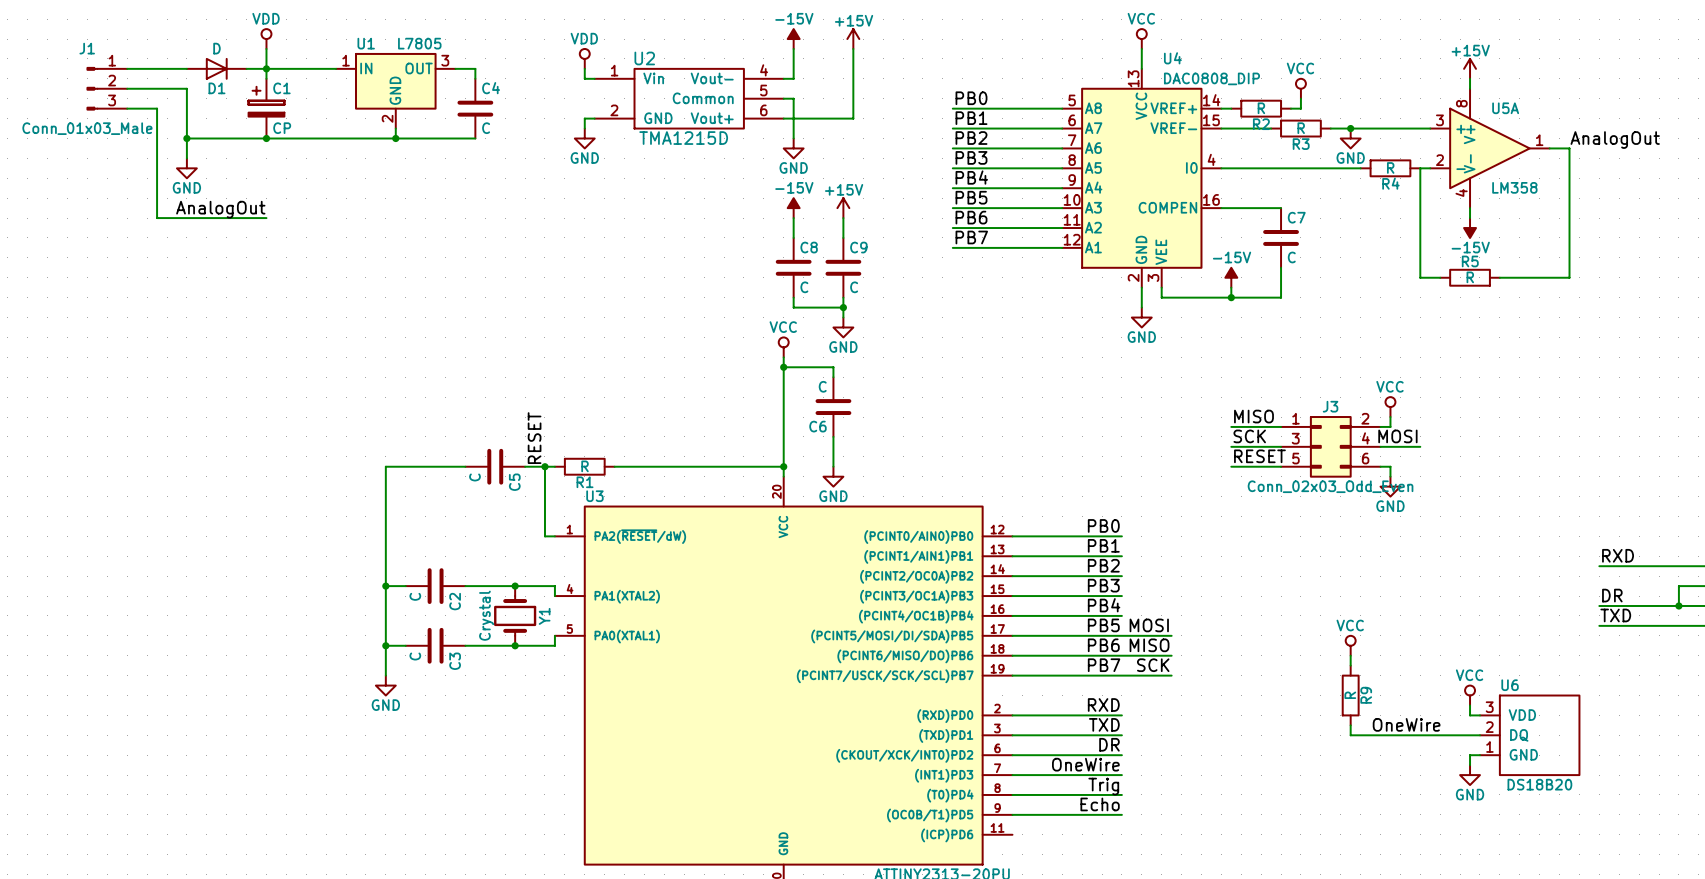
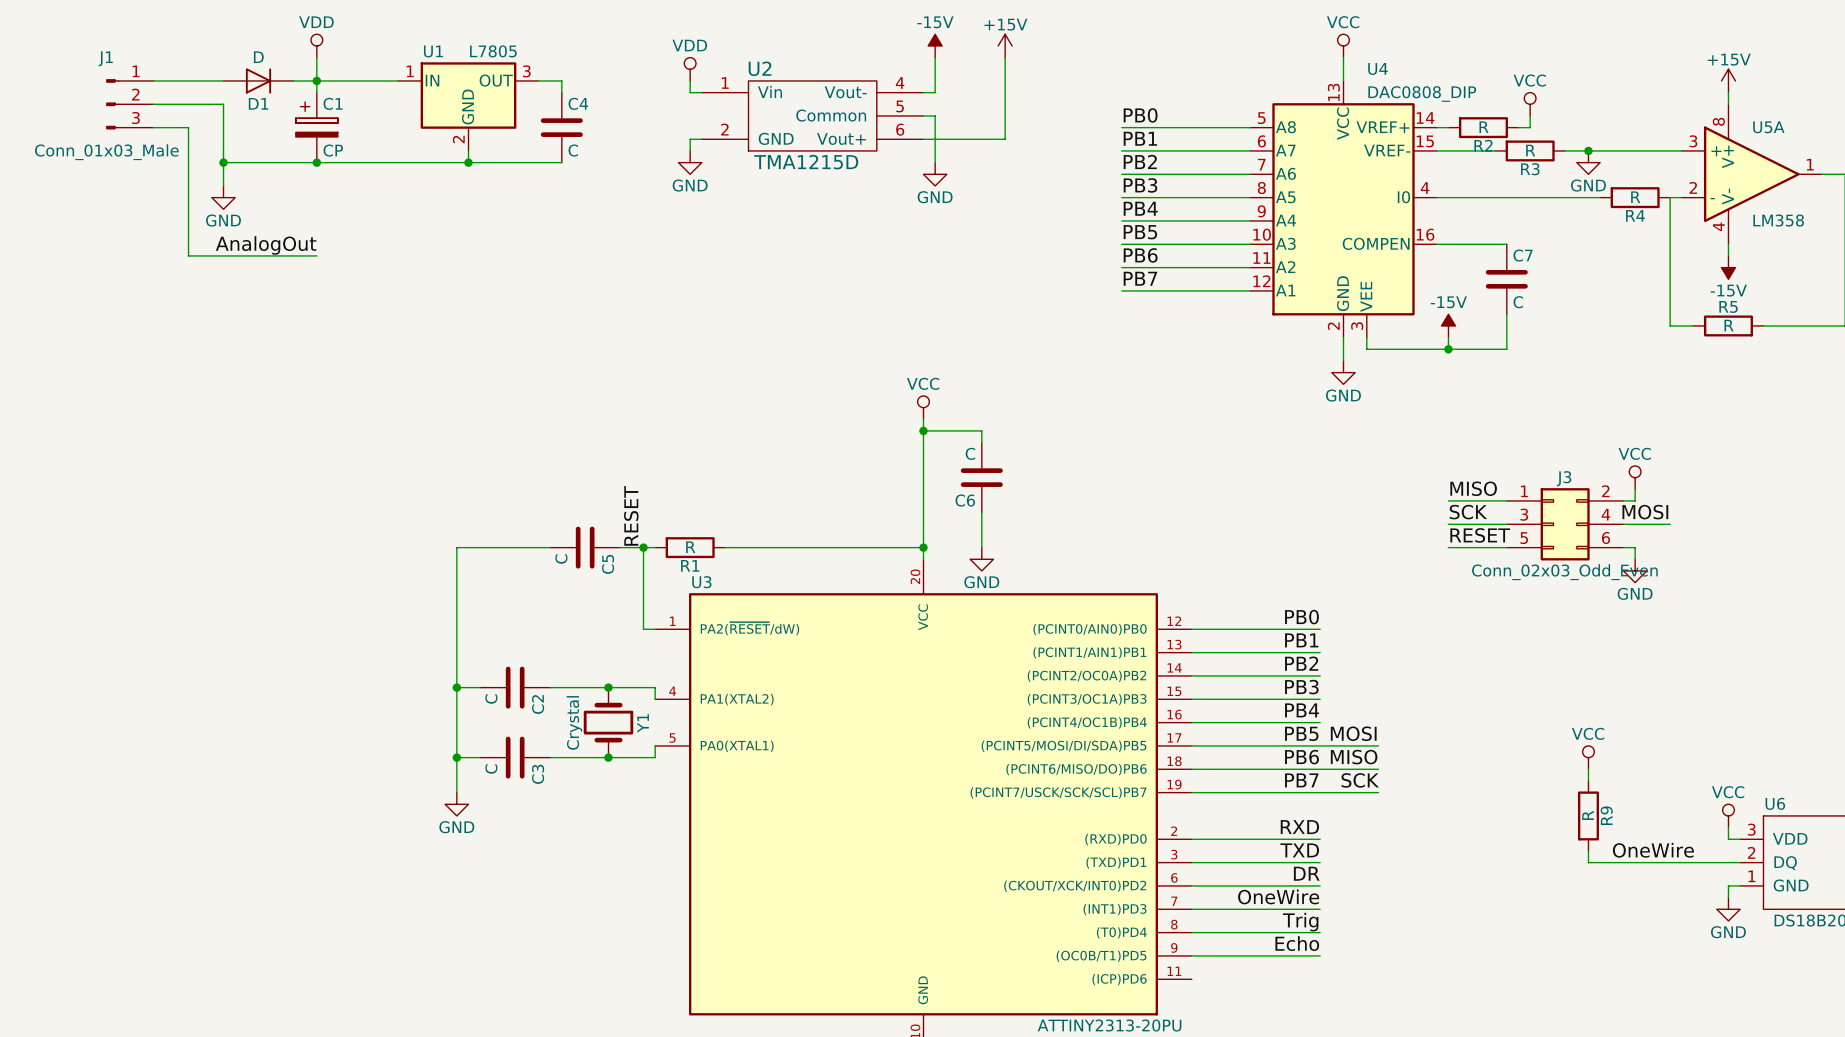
power symbol: -15V (793, 208) -> none
power symbol: +15V (843, 208) -> none
wire: (793, 218) (793, 237) -> none
wire: (843, 218) (843, 237) -> none
C8: C (793, 267) -> none
C9: C (843, 267) -> none
wire: (793, 297) (793, 307) (843, 307) -> none
wire: (843, 297) (843, 317) -> none
junction: (843, 307) -> none
power symbol: GND (843, 327) -> none

